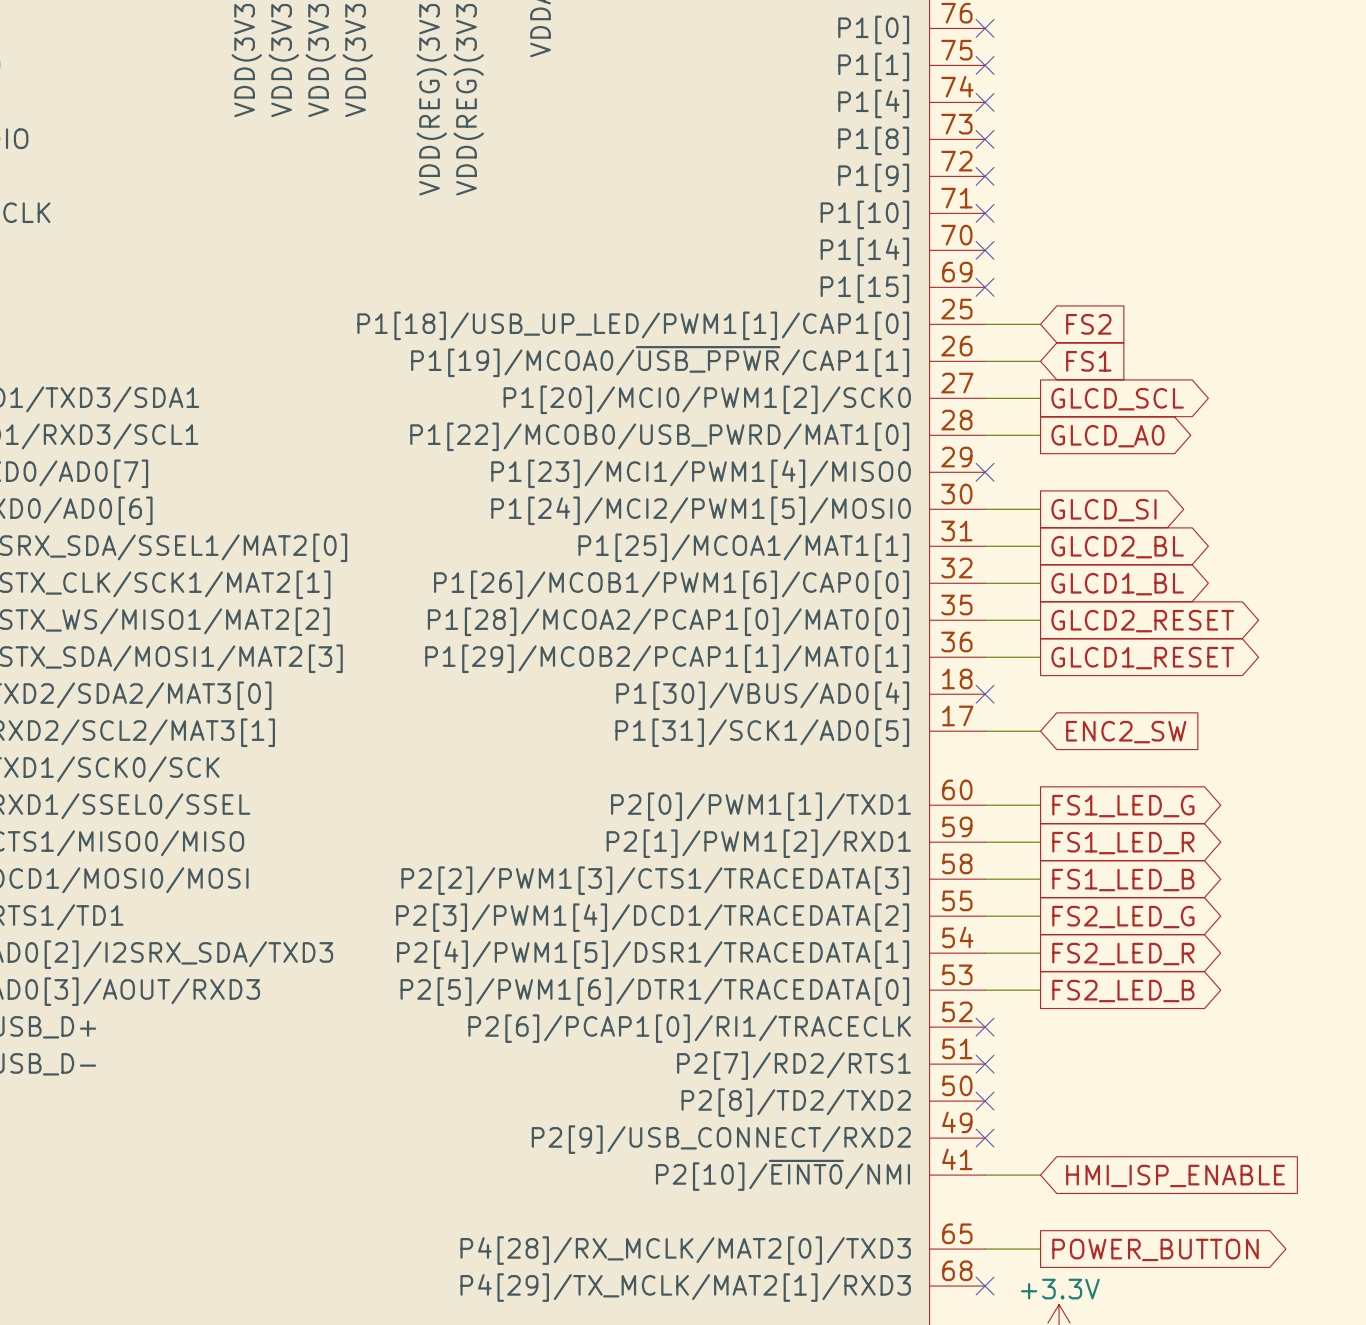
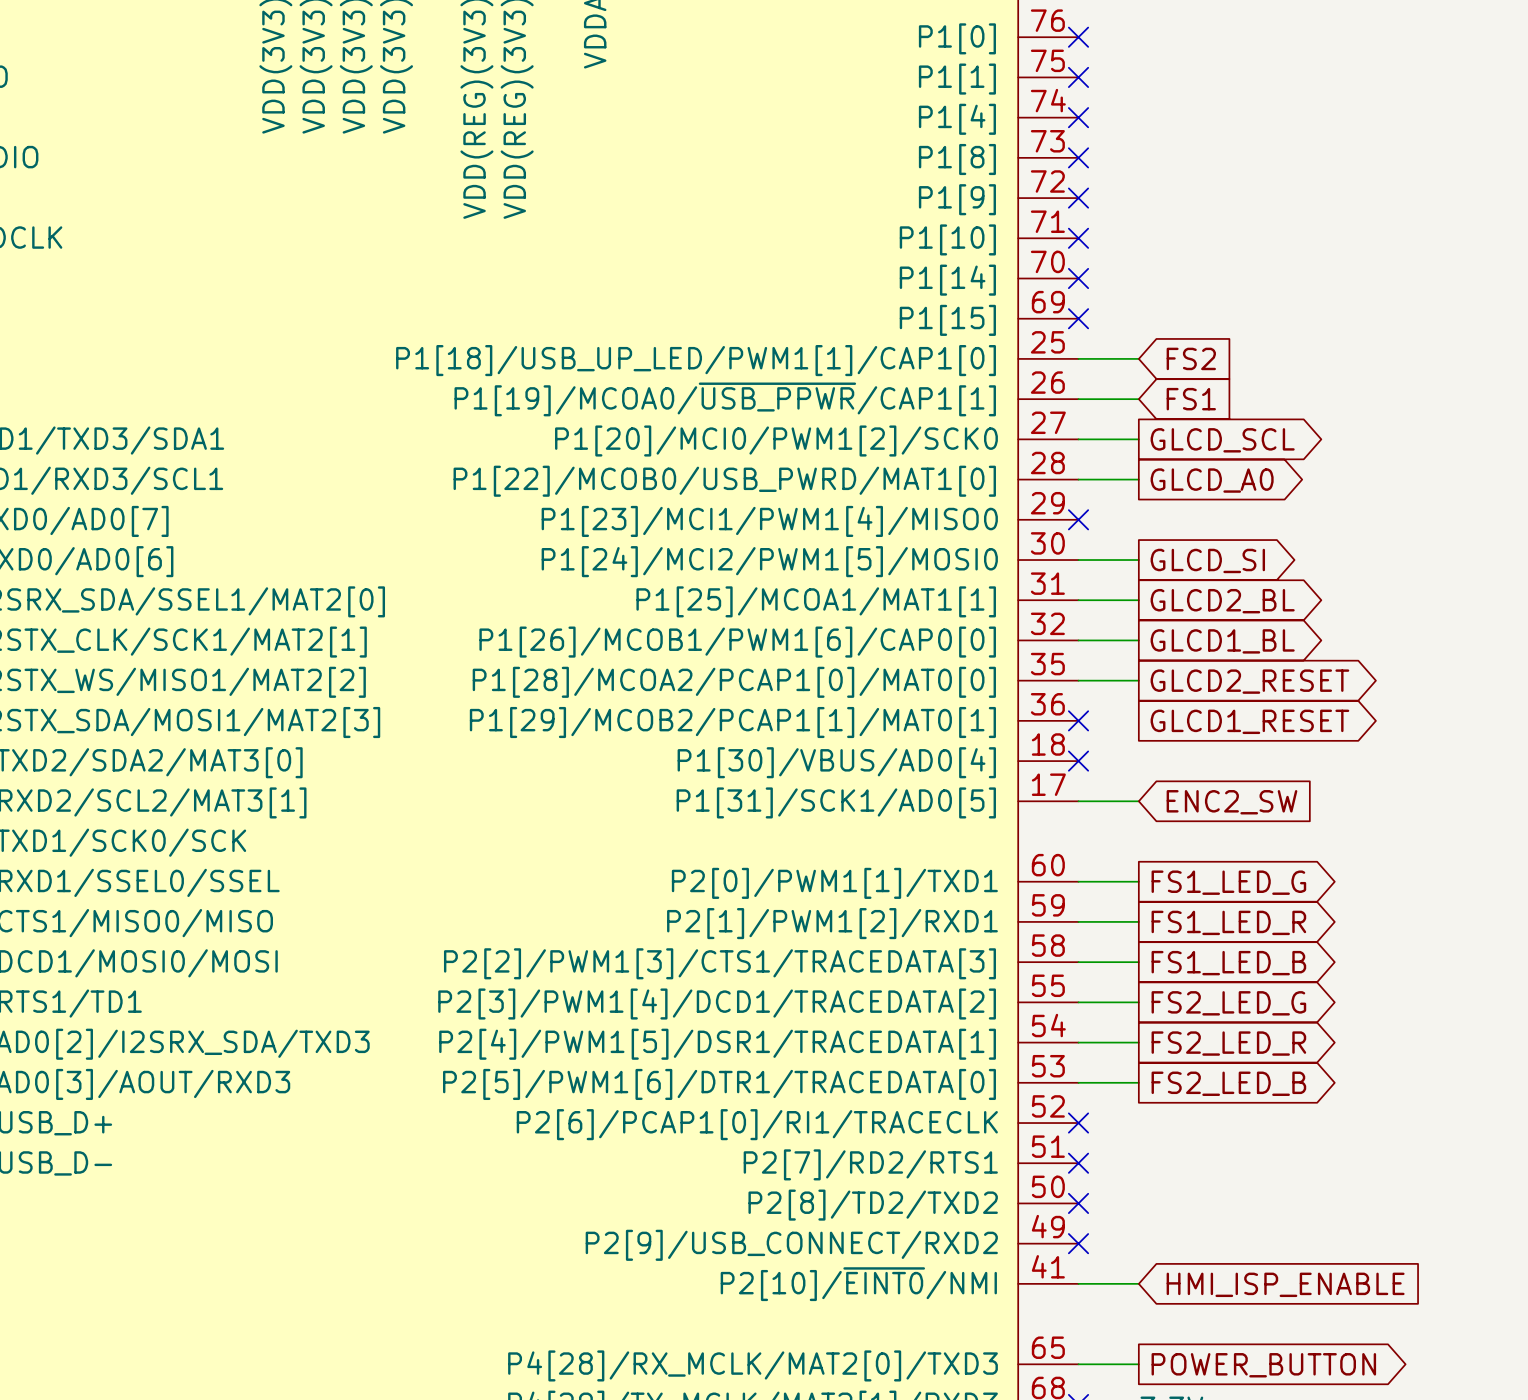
wire: (985, 657) (1040, 657) -> none
no-connect mark: none -> (1078, 720)

